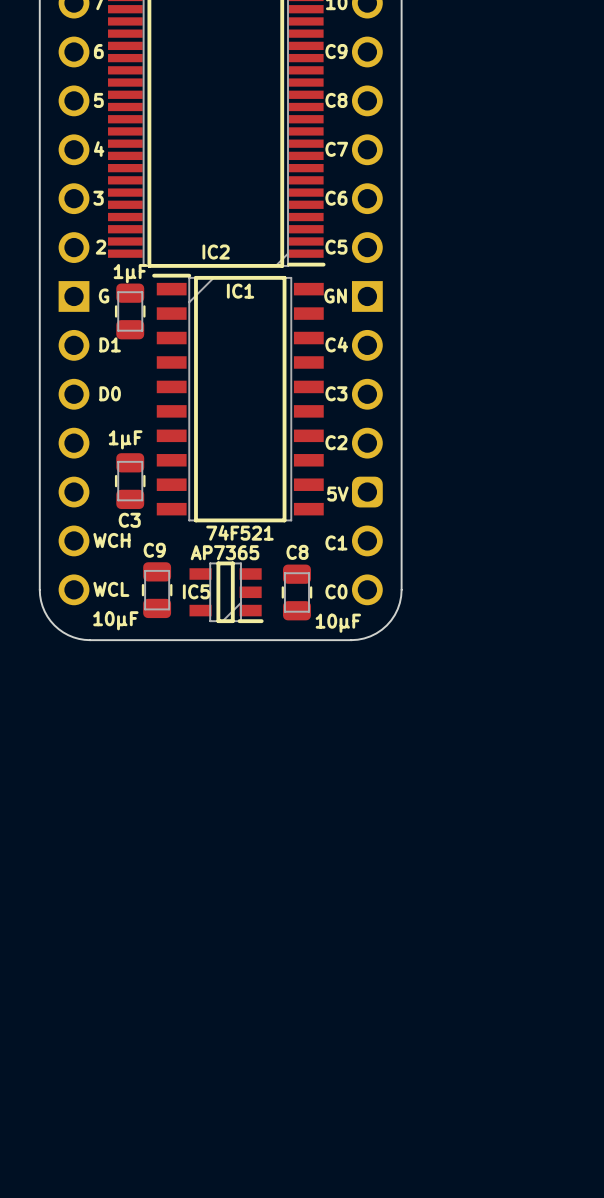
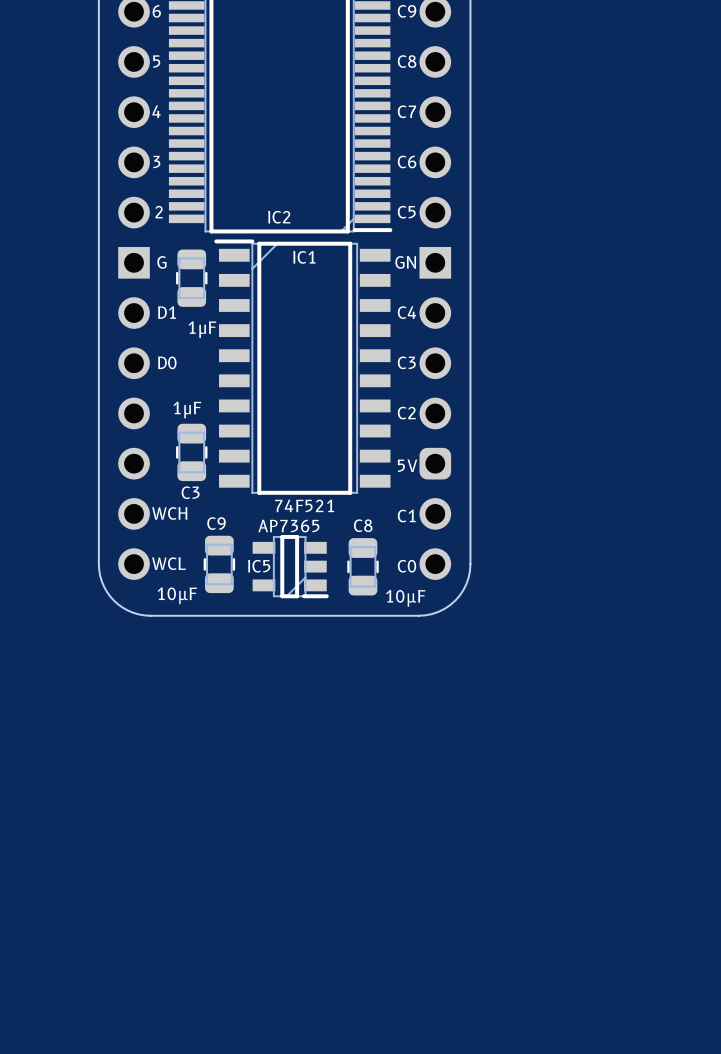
part value position: 1μF (130, 273) -> 1μF (202, 329)

